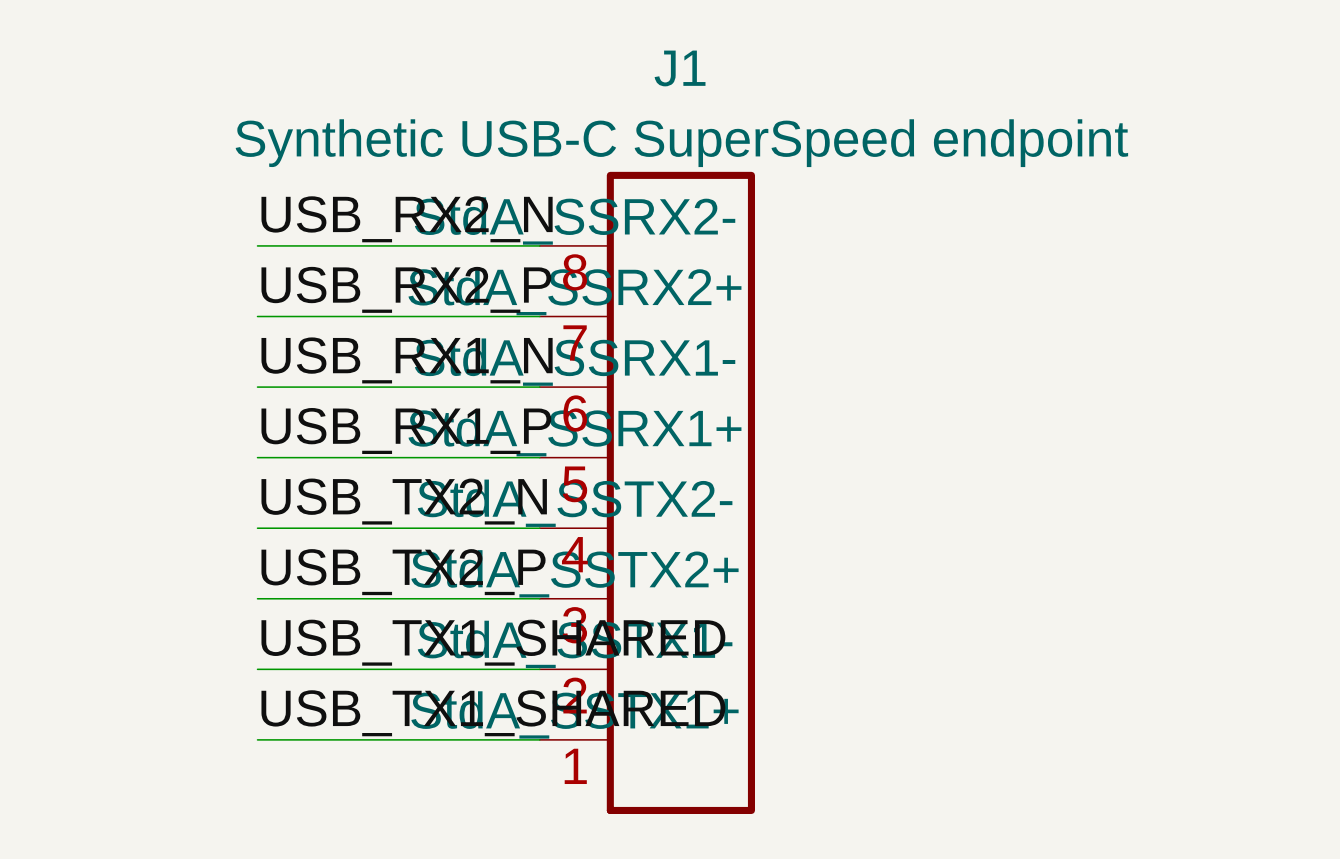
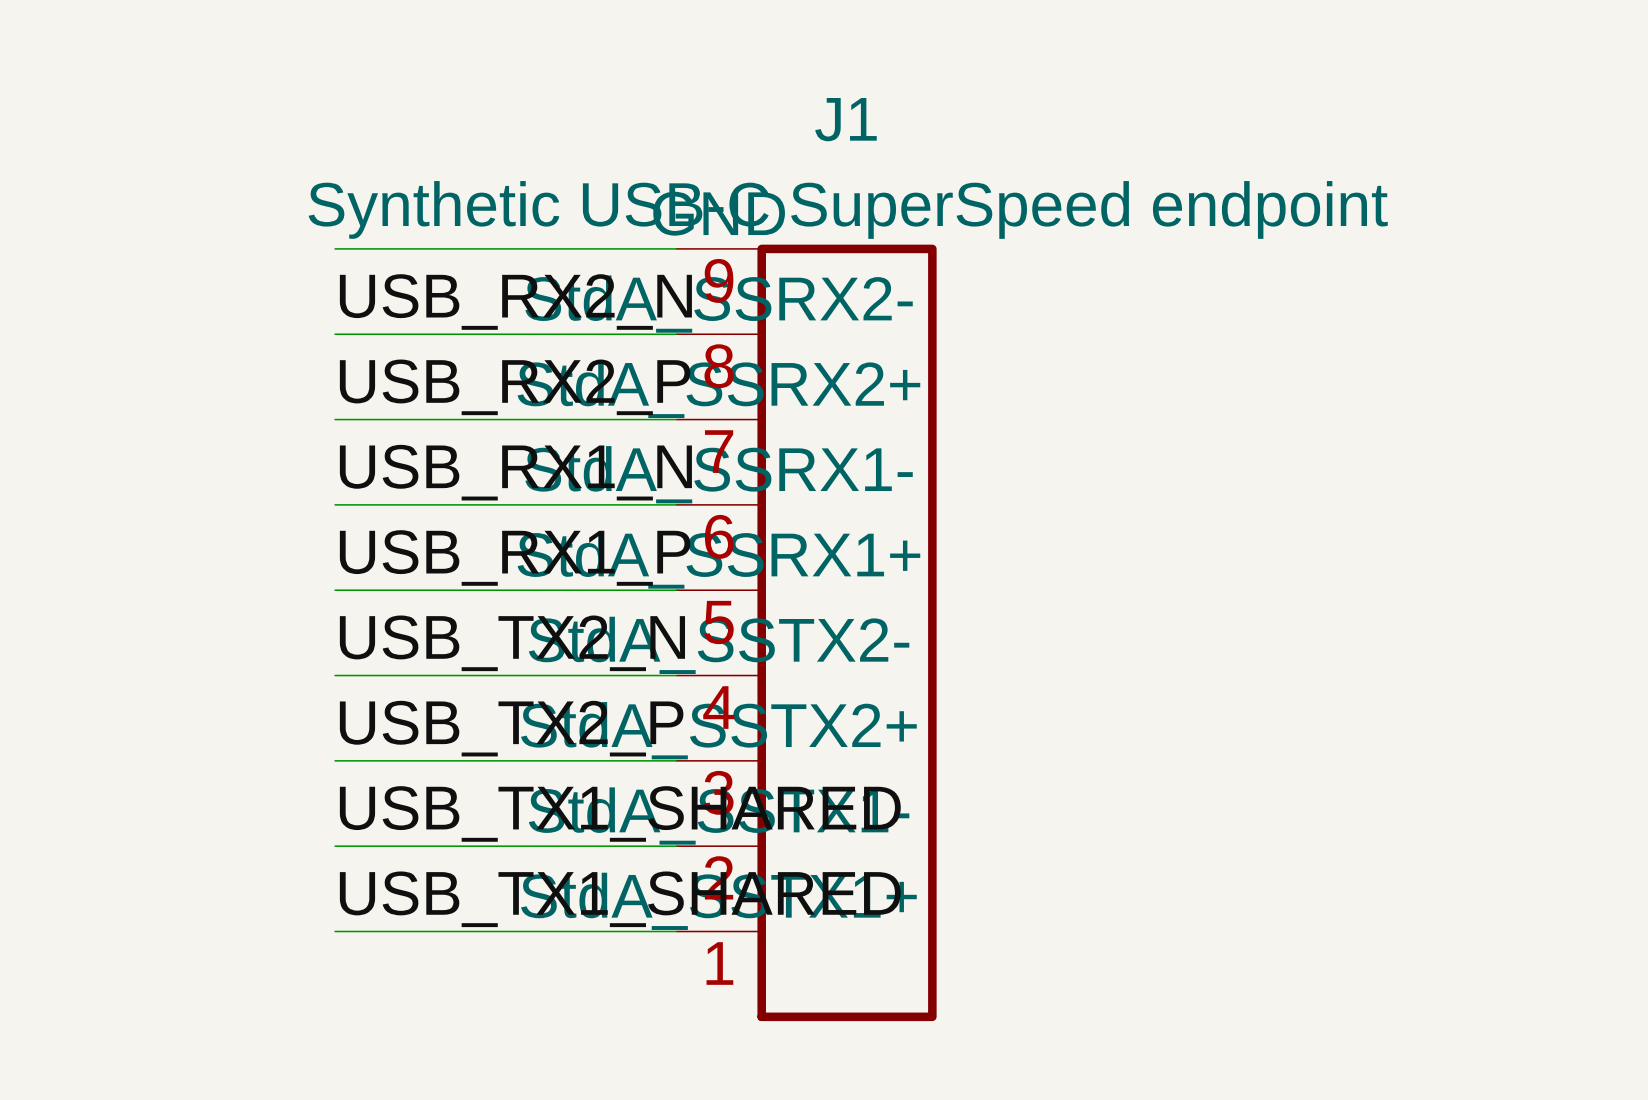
J1 symbol: [539, 171, 755, 814] -> [676, 244, 937, 1022]
wire: none -> (335, 248) (676, 248)

